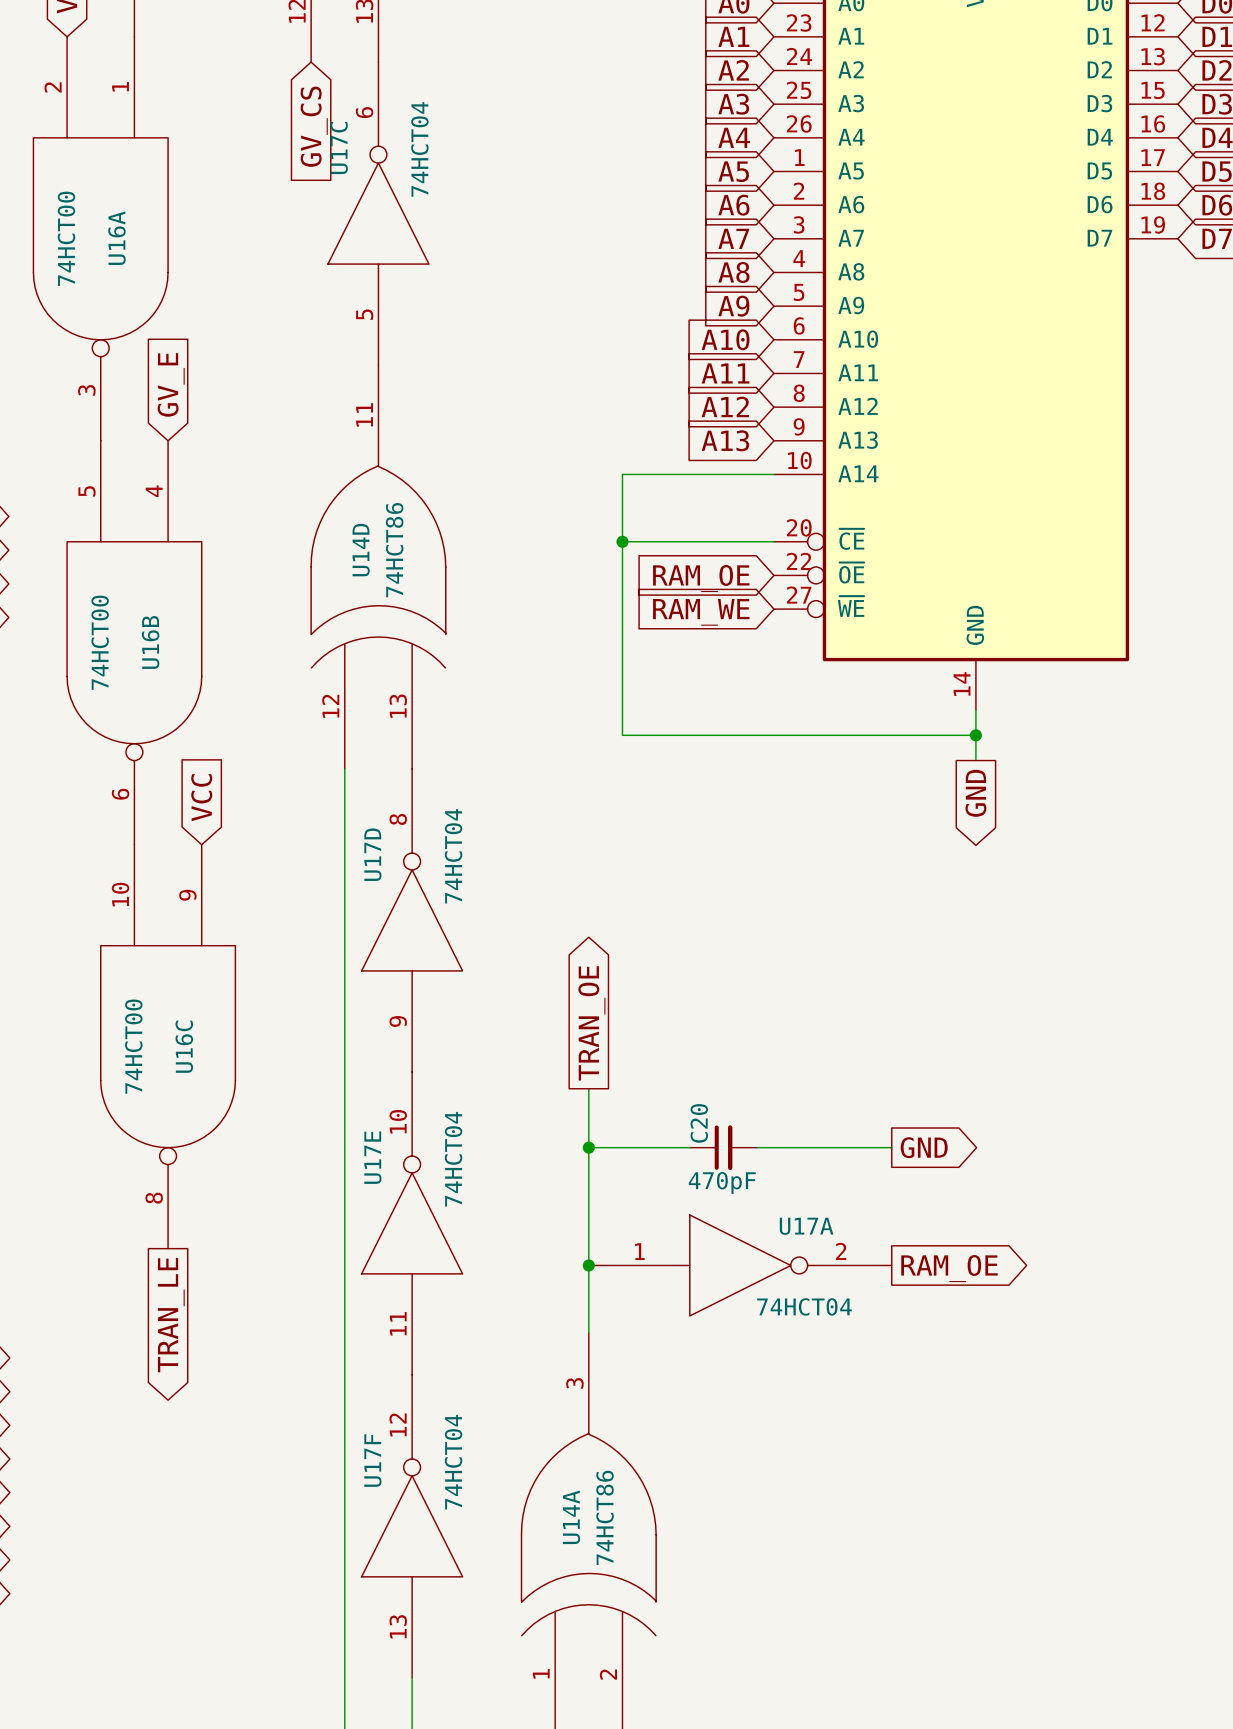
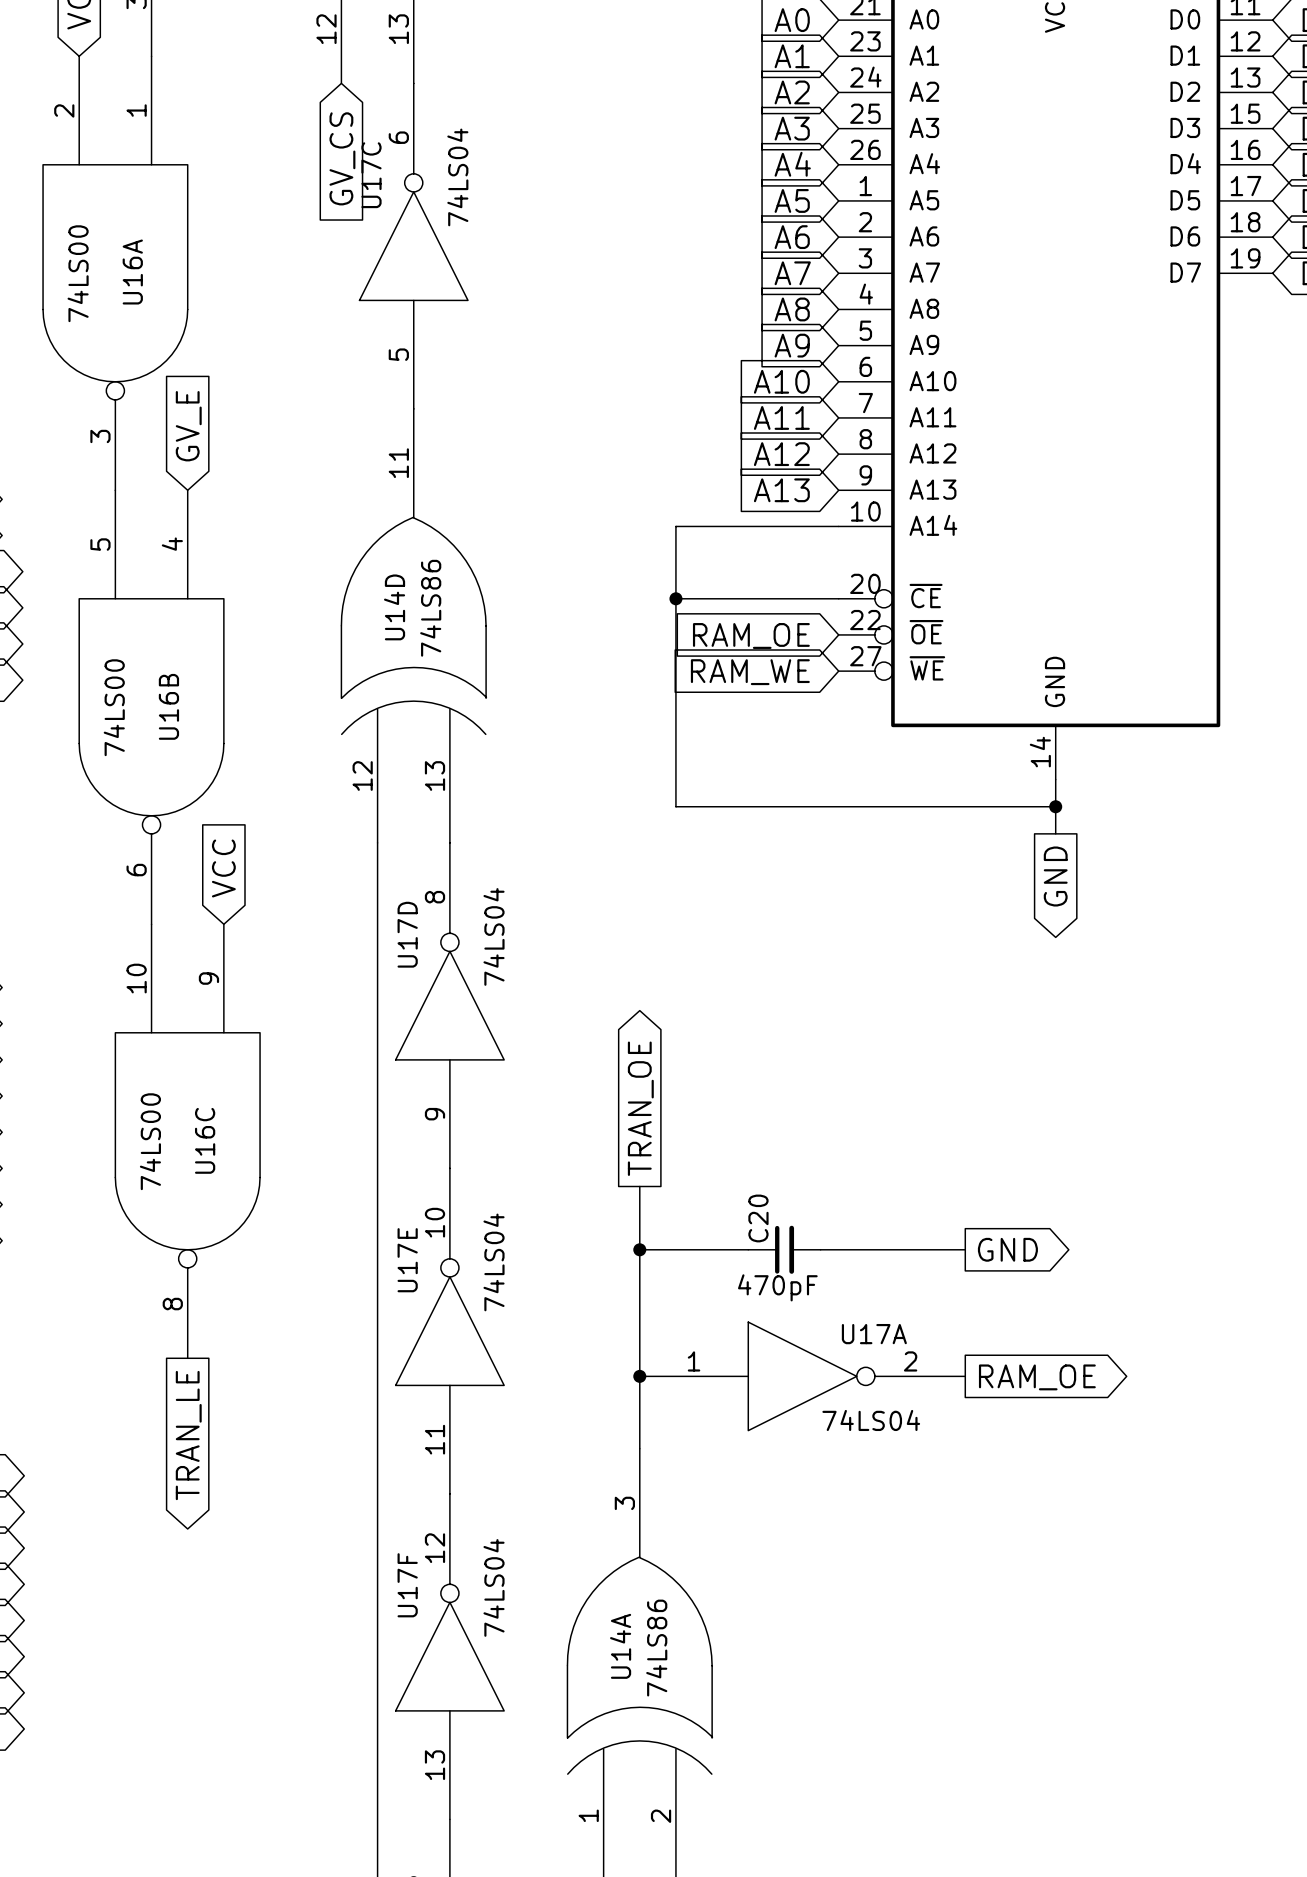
U17C value: 74HCT04 (419, 149) -> 74LS04 (457, 177)
U16A value: 74HCT00 (66, 238) -> 74LS00 (78, 273)
U14D value: 74HCT86 (394, 550) -> 74LS86 (430, 608)
U16B value: 74HCT00 (100, 642) -> 74LS00 (114, 707)
U17D value: 74HCT04 (453, 856) -> 74LS04 (494, 936)
U16C value: 74HCT00 (133, 1046) -> 74LS00 (150, 1141)
U17E value: 74HCT04 (453, 1159) -> 74LS04 (494, 1262)
U17A value: 74HCT04 (804, 1306) -> 74LS04 (871, 1420)
U17F value: 74HCT04 (453, 1462) -> 74LS04 (494, 1587)
U14A value: 74HCT86 (605, 1517) -> 74LS86 (656, 1648)

